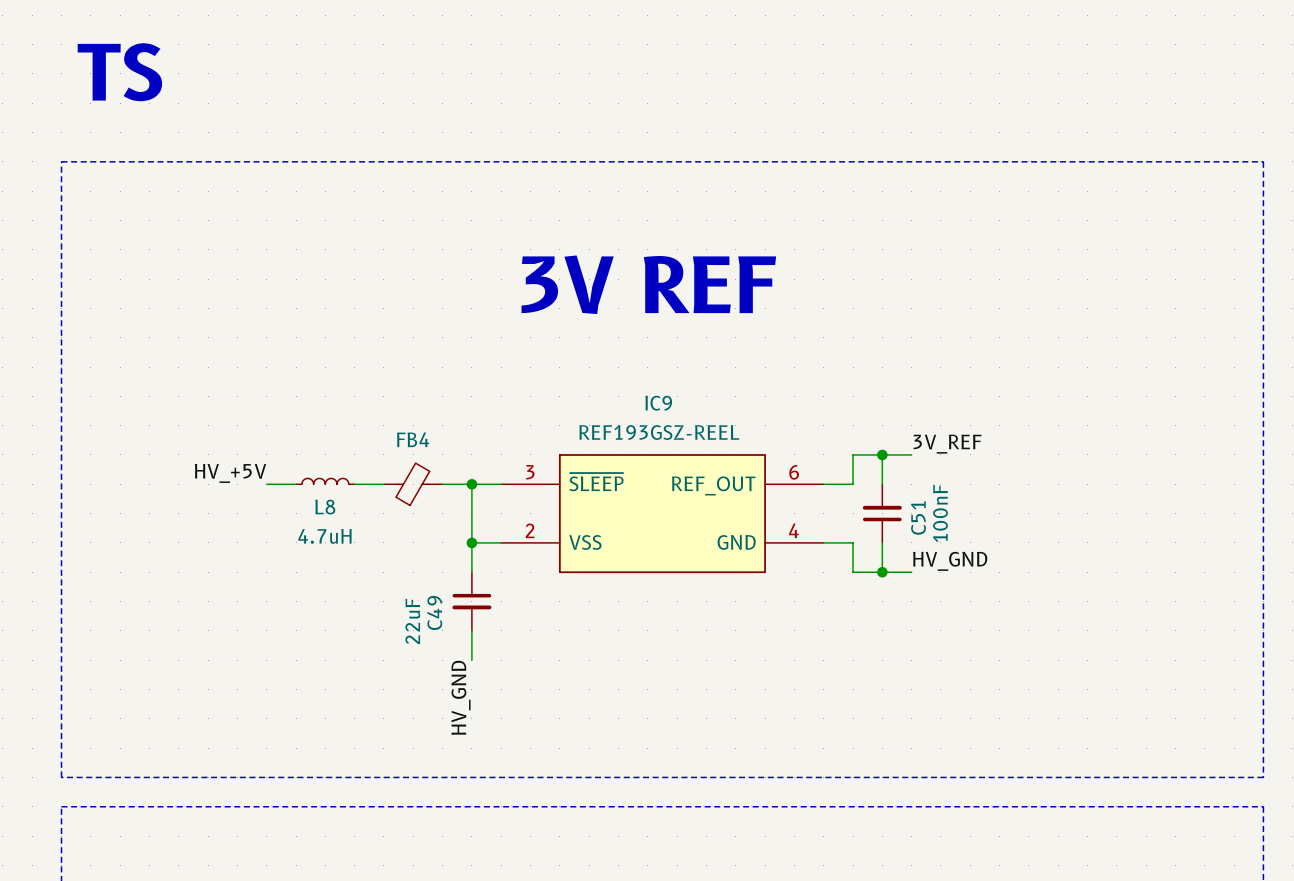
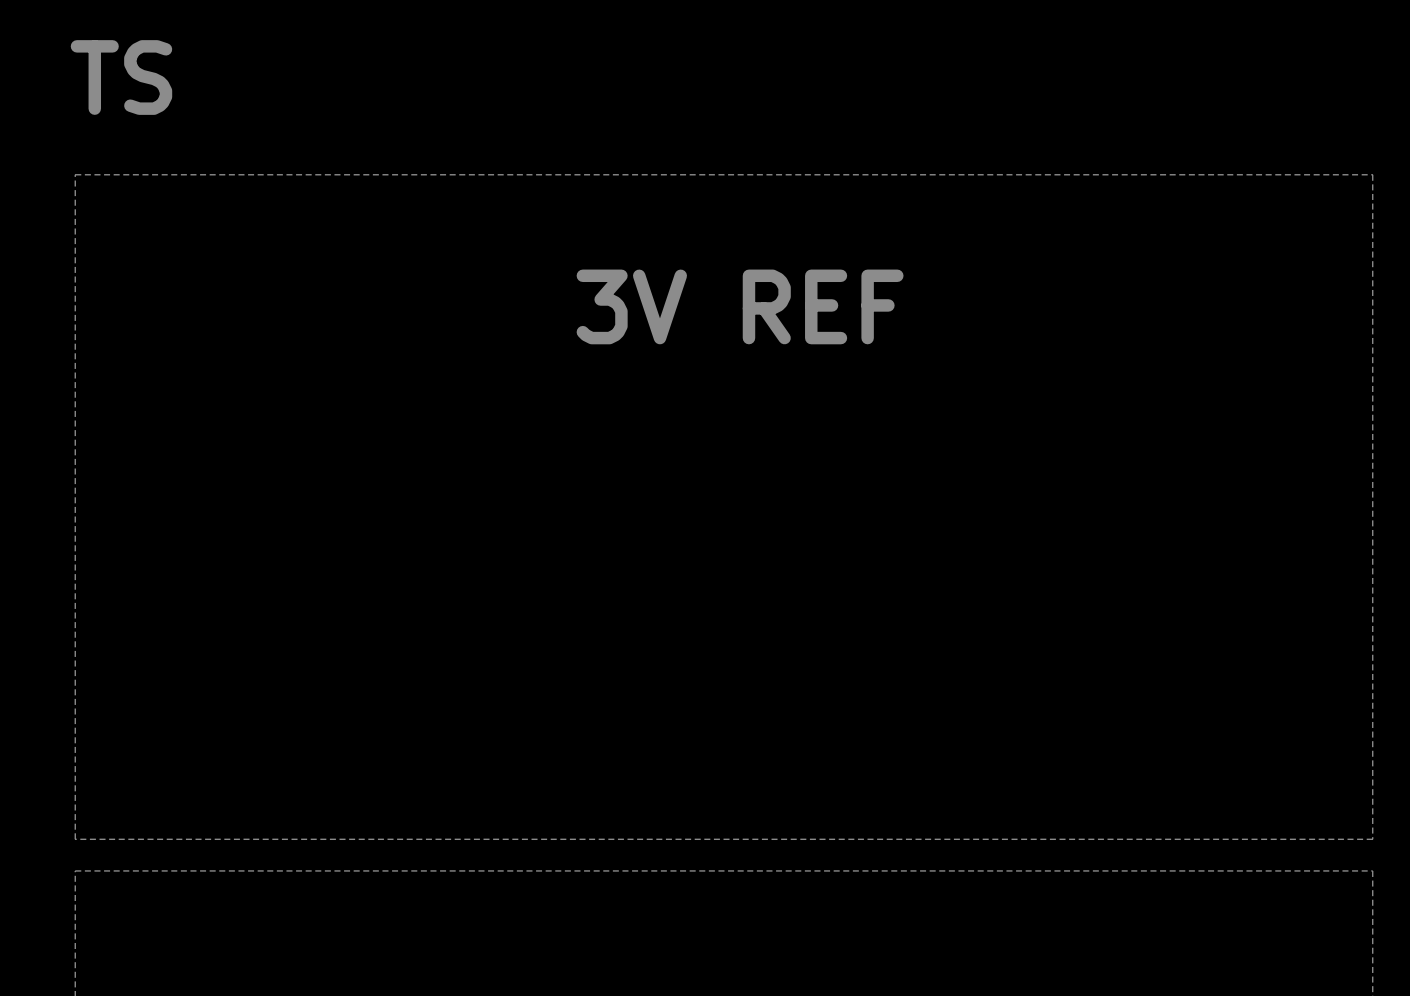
label: 3V_REF (947, 444) -> none
wire: (882, 454) (882, 484) -> none
junction: (882, 454) -> none
wire: (911, 454) (853, 454) (853, 484) (823, 484) -> none
label: HV_+5V (230, 473) -> none
L8: 4.7uH (325, 481) -> none
wire: (266, 484) (296, 484) -> none
wire: (354, 484) (383, 484) -> none
FB4: (413, 484) -> none
wire: (442, 484) (501, 484) -> none
wire: (471, 484) (471, 572) -> none
junction: (471, 484) -> none
IC9: REF193GSZ-REEL (662, 513) -> none
C51: 100nF (882, 513) -> none
wire: (471, 542) (501, 542) -> none
junction: (471, 542) -> none
wire: (823, 542) (853, 542) (853, 572) (911, 572) -> none
wire: (882, 542) (882, 572) -> none
label: HV_GND (950, 561) -> none
junction: (882, 572) -> none
C49: 22uF (471, 601) -> none
wire: (471, 630) (471, 660) -> none
label: HV_GND (461, 697) -> none

